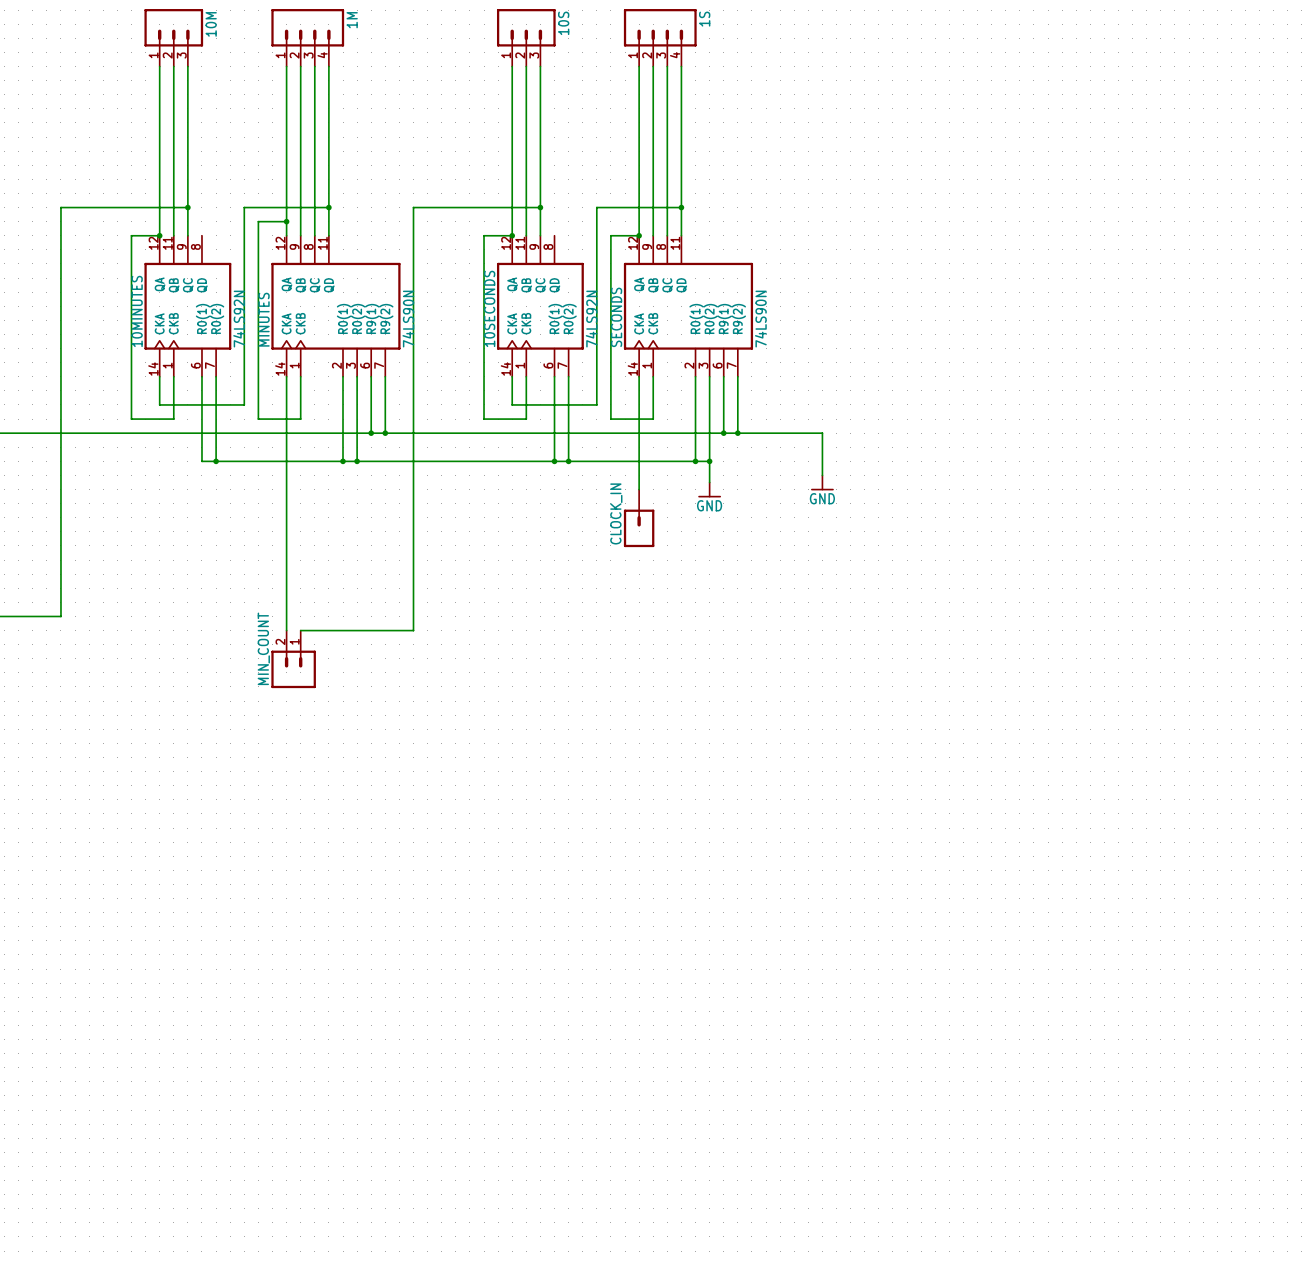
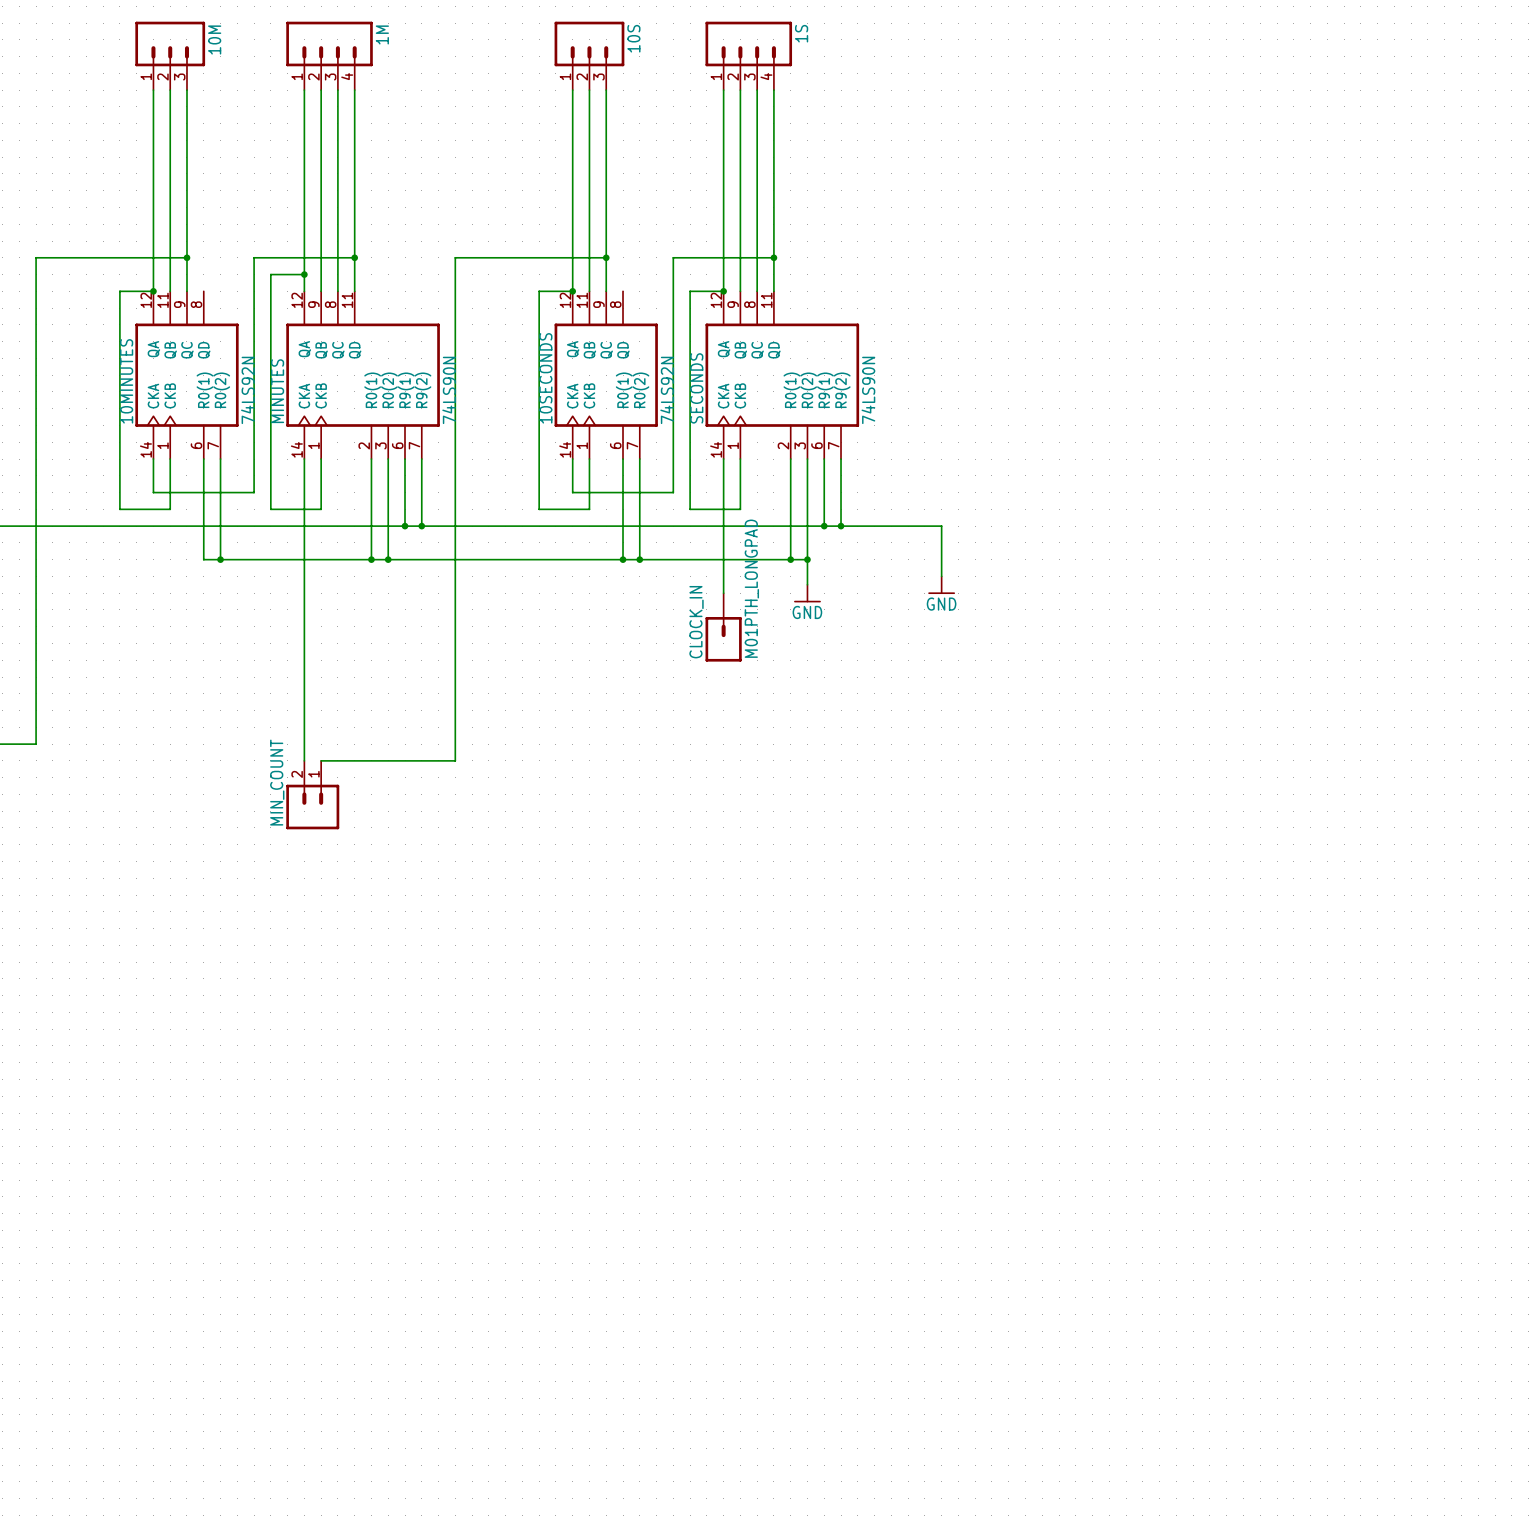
CLOCK_IN value: none -> M01PTH_LONGPAD (751, 588)

